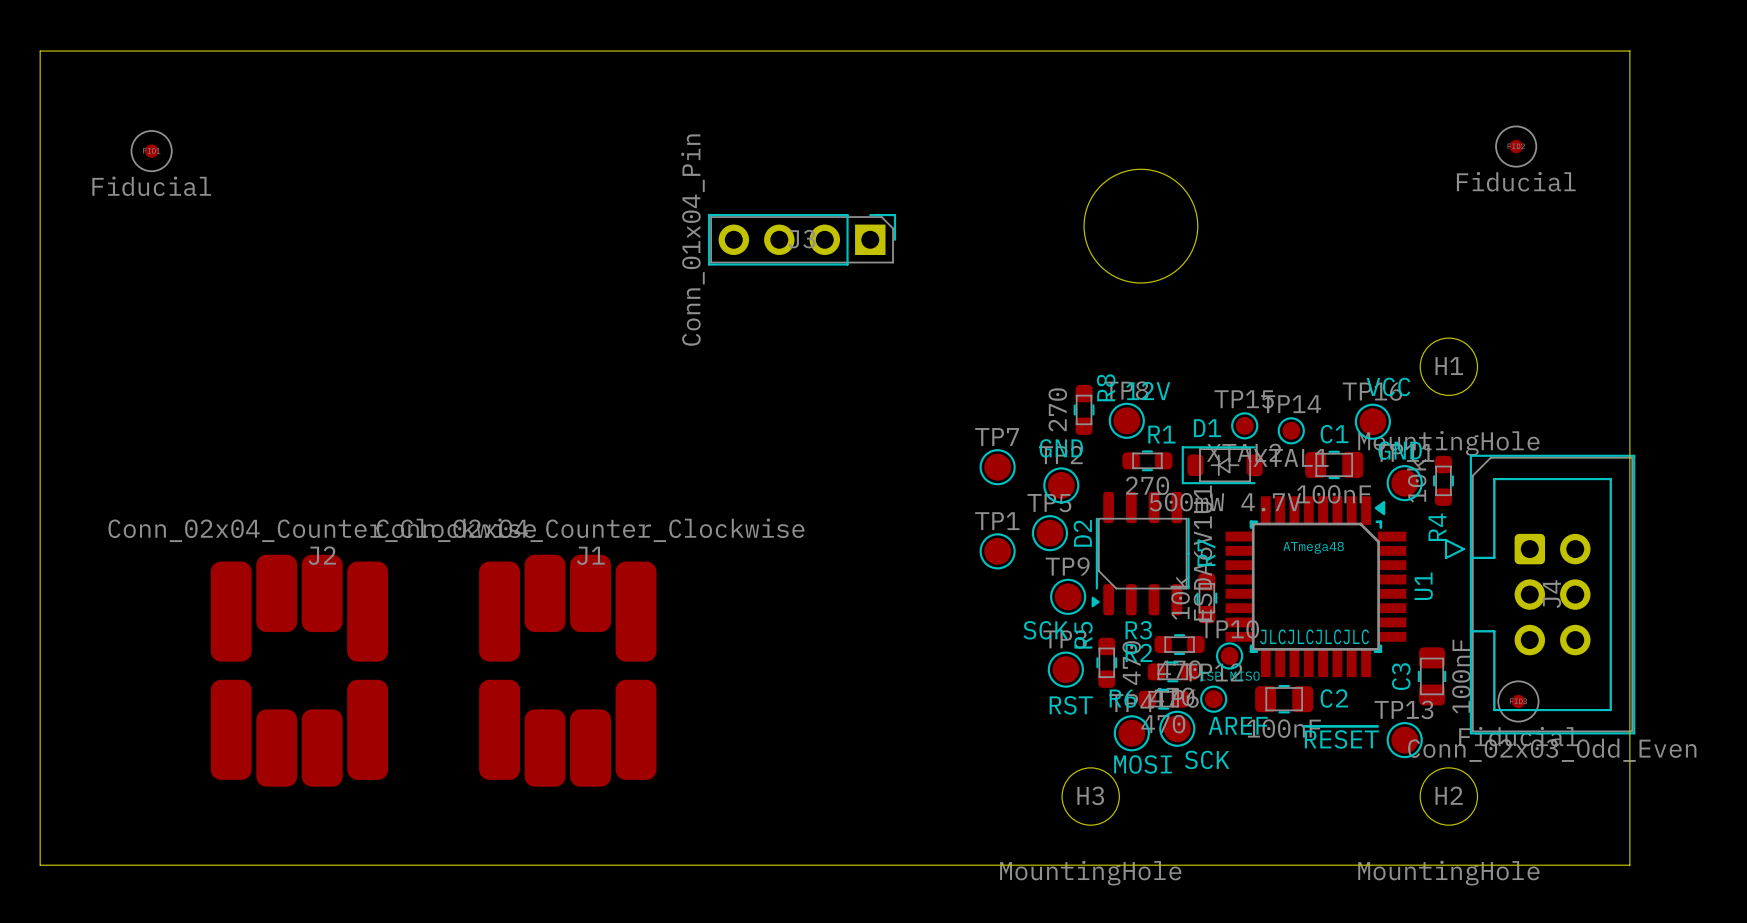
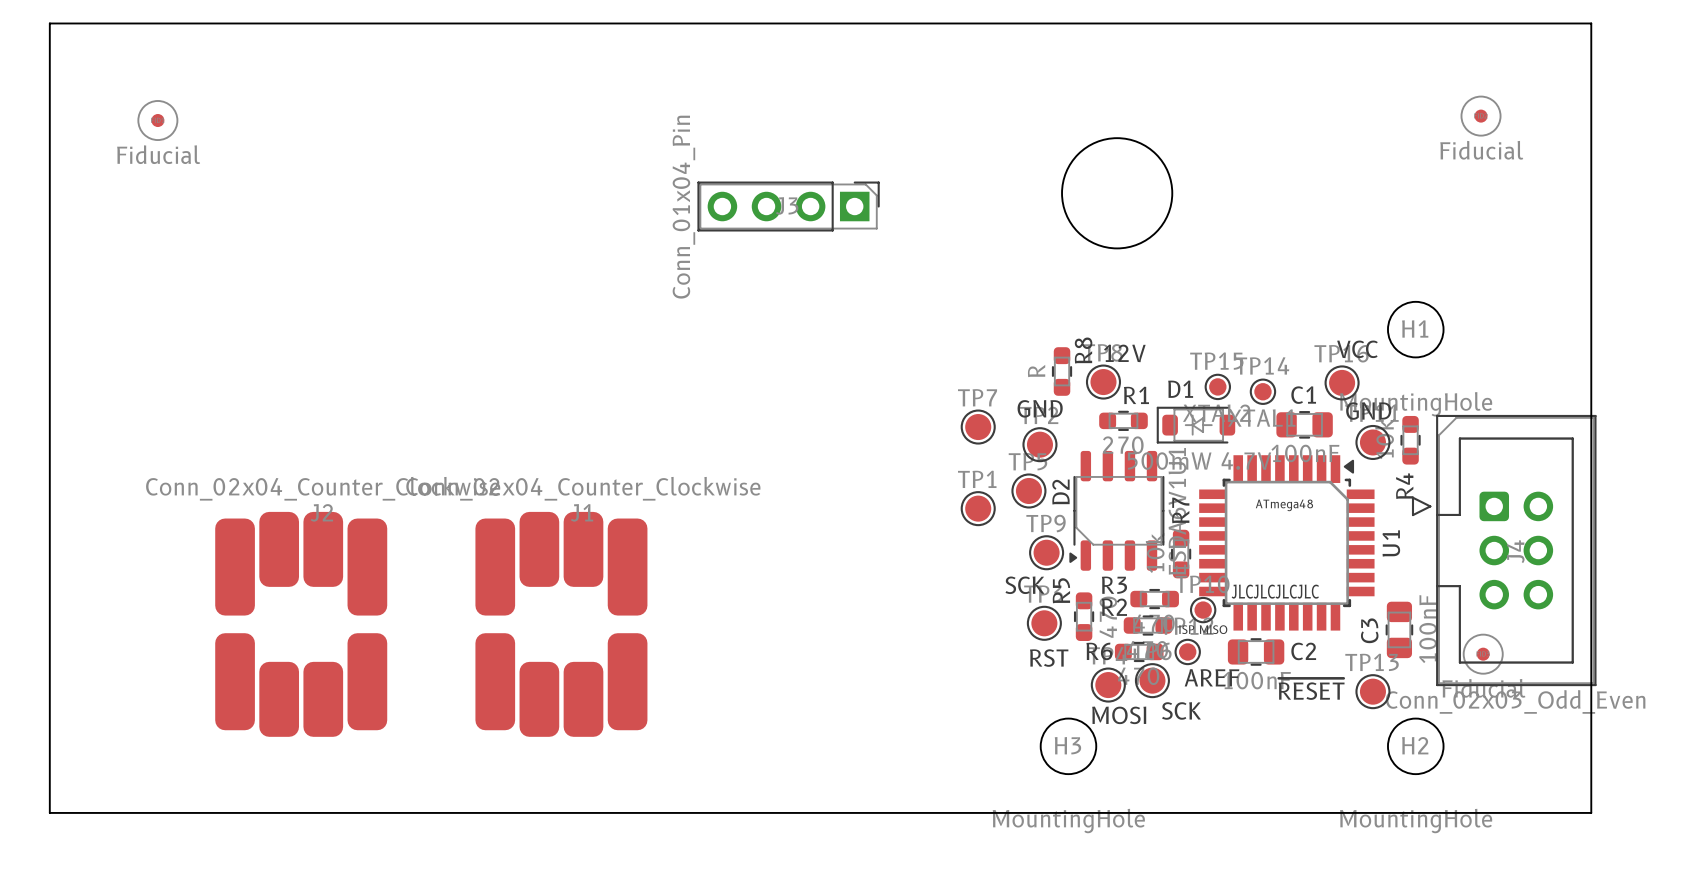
R8 value: 270 (1057, 409) -> R (1036, 370)

